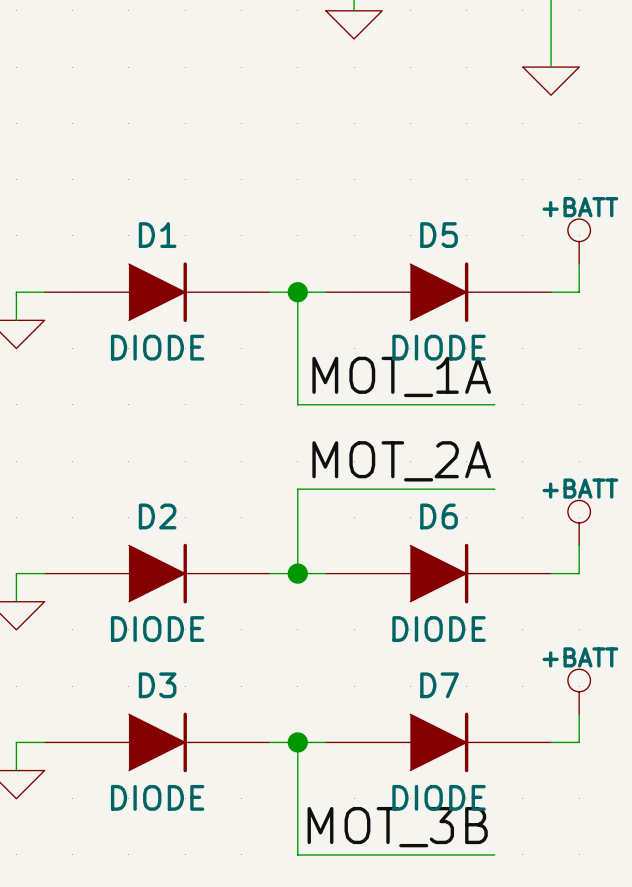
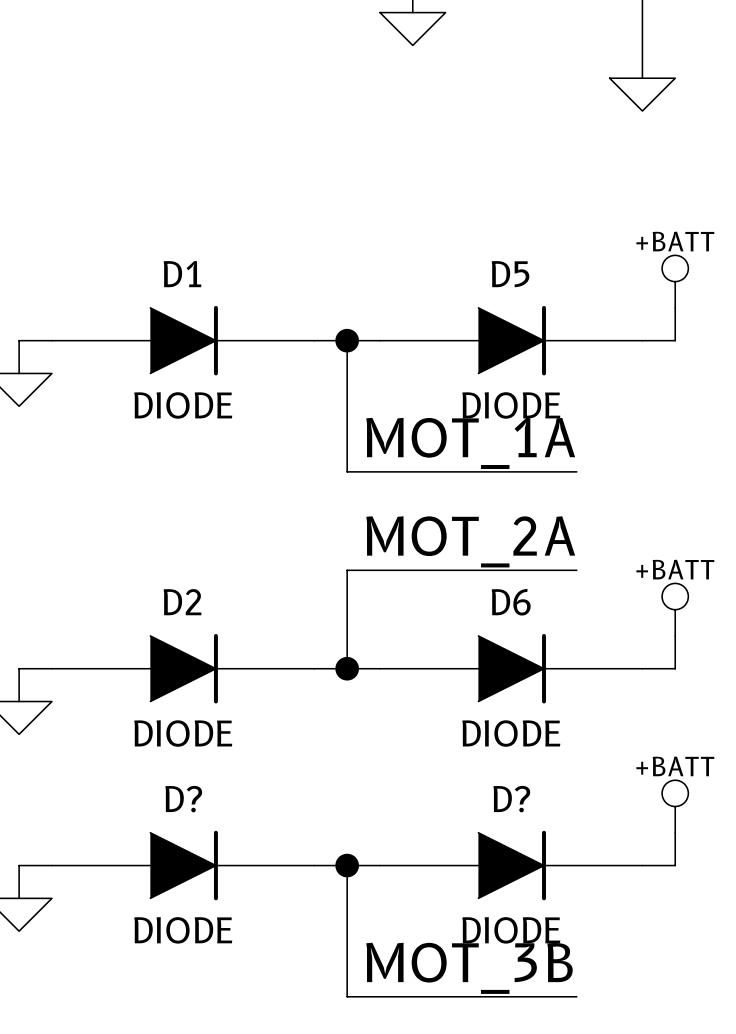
D3 name: D3 (157, 685) -> D? (183, 799)
D7 name: D7 (439, 685) -> D? (511, 799)

